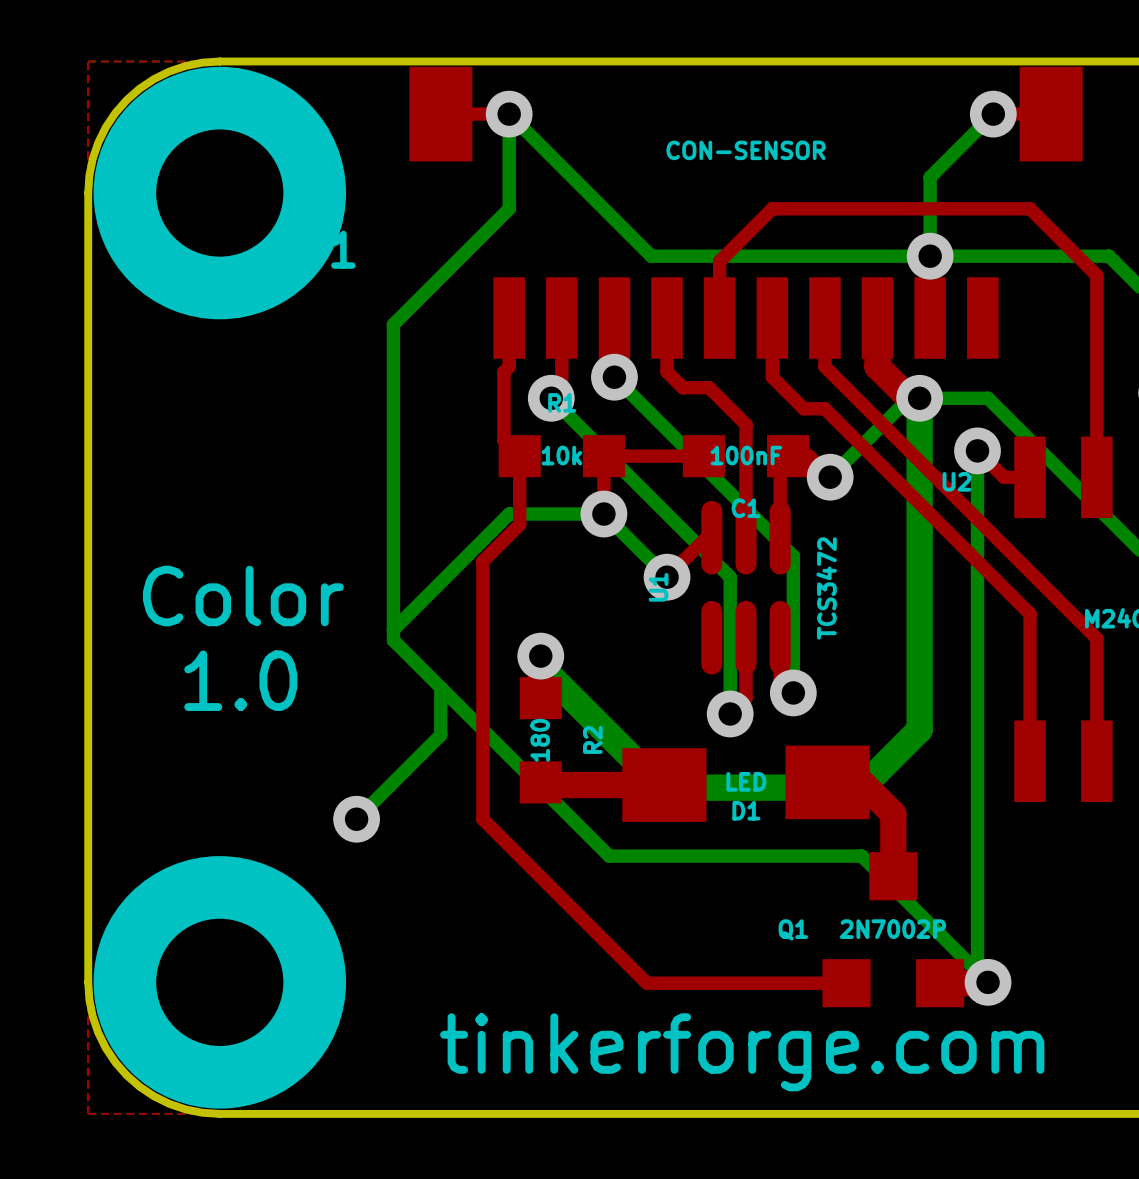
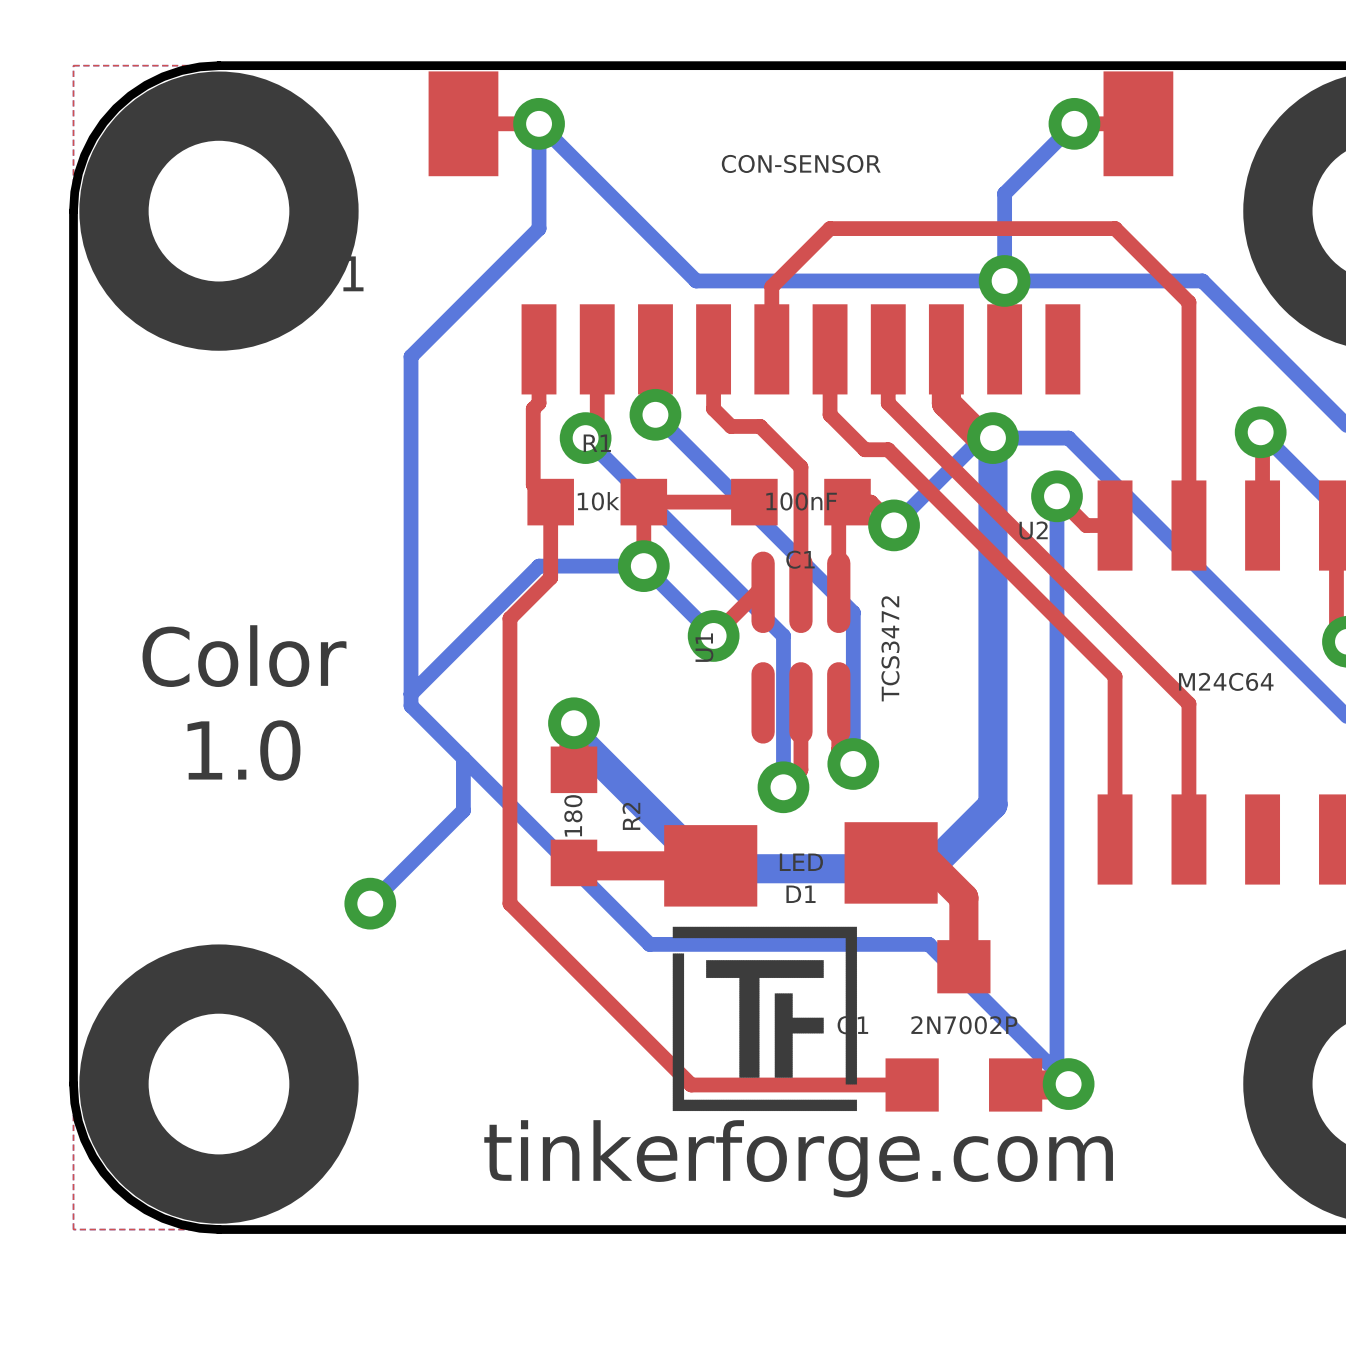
drawing: none -> [672, 926, 858, 1112]

